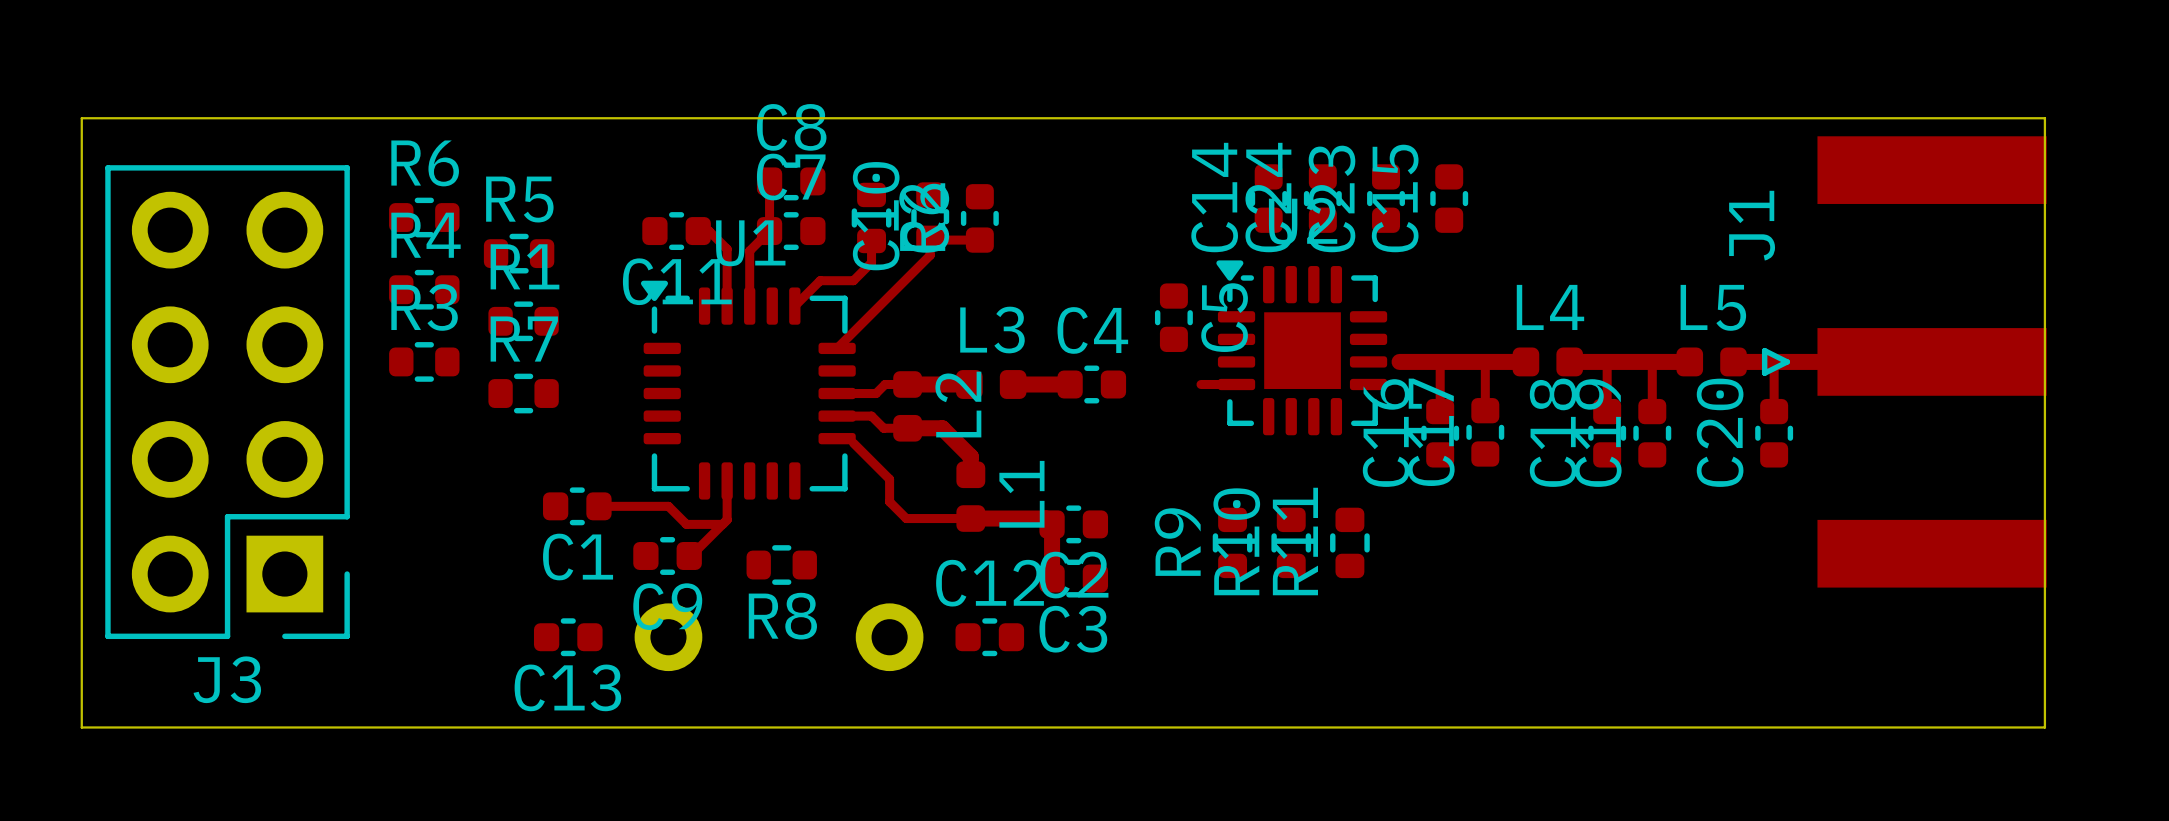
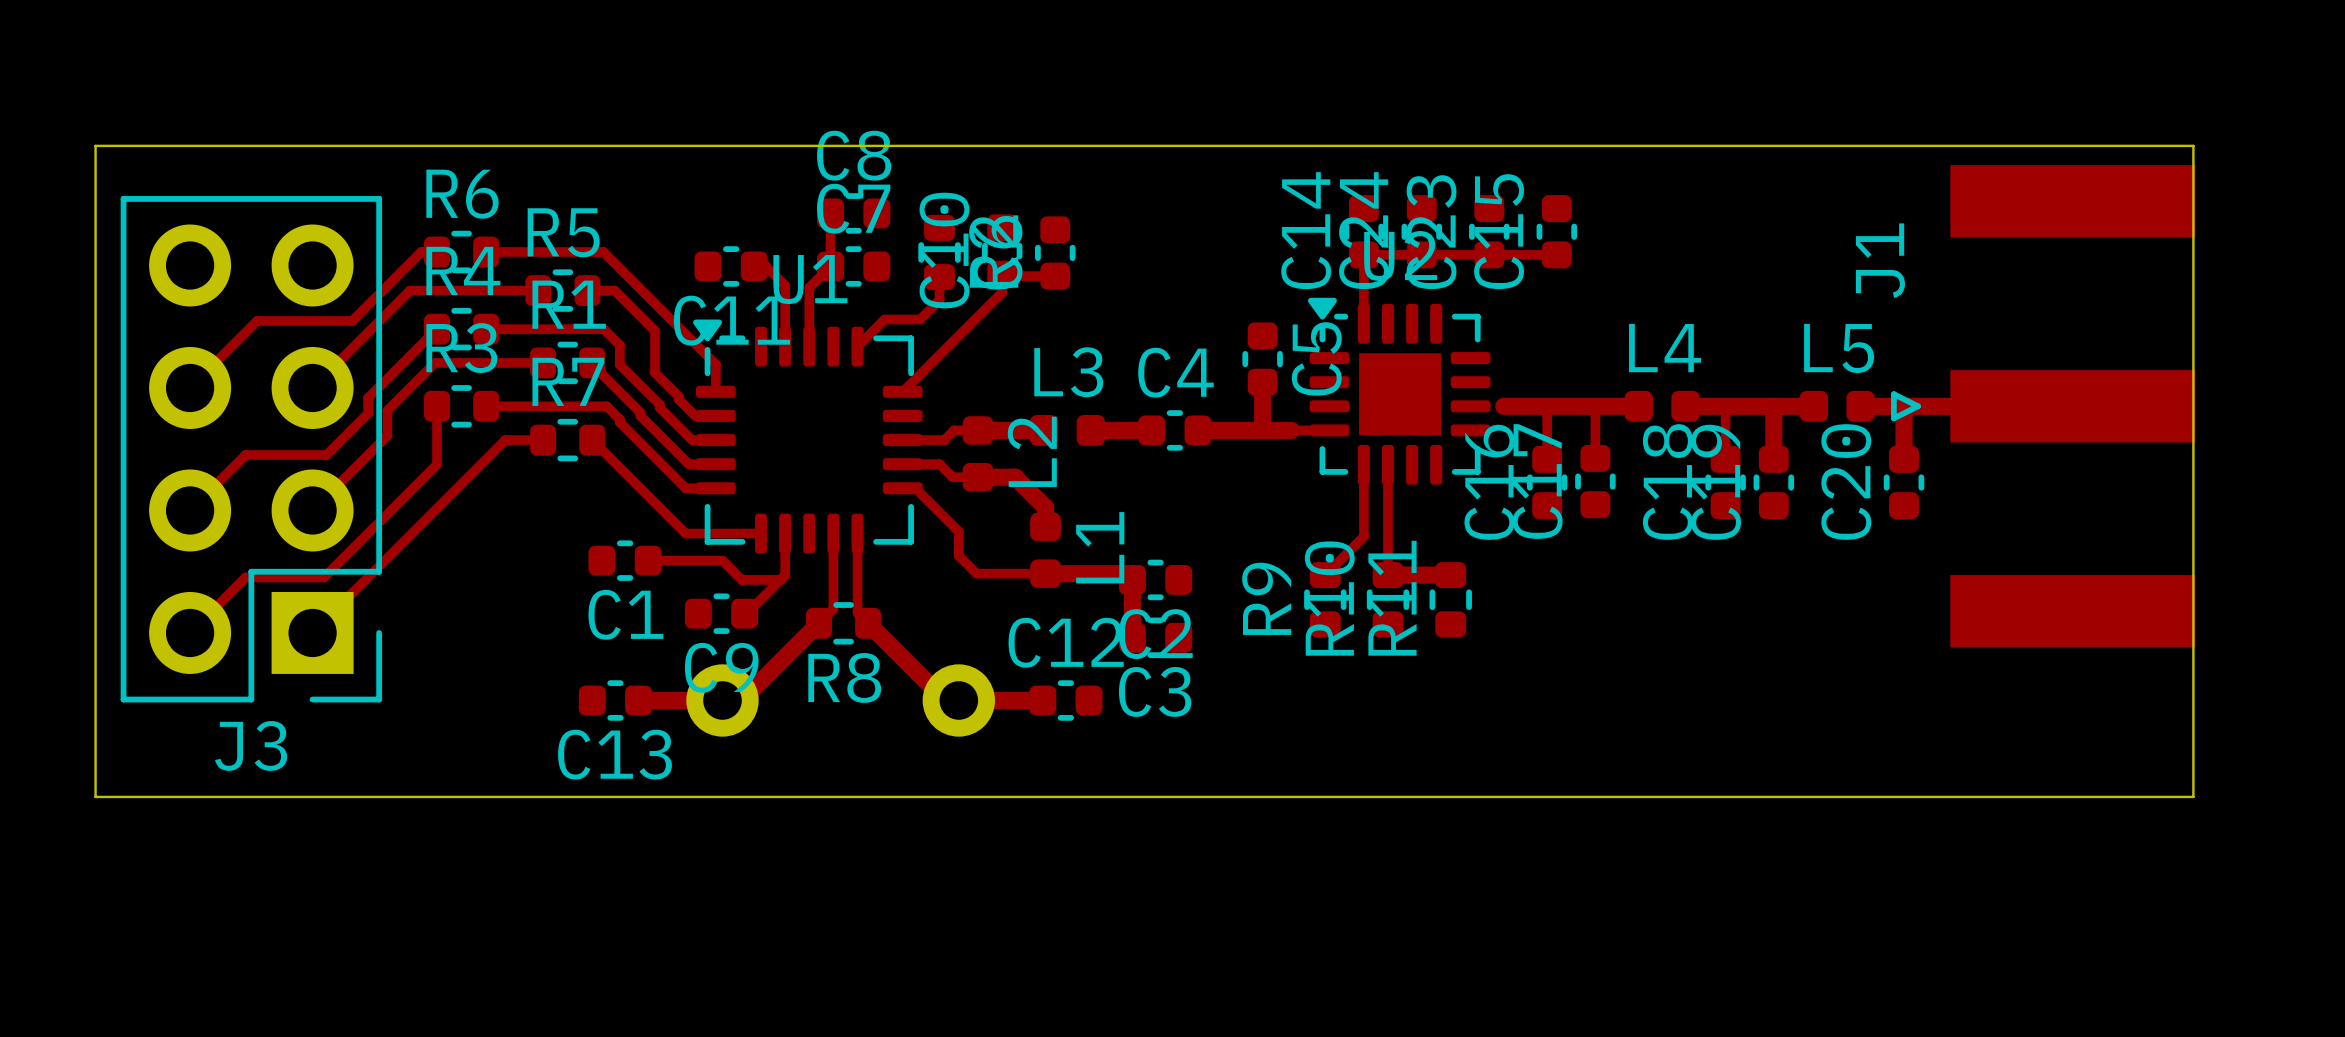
track: none -> (437, 251) (421, 251) (352, 321) (257, 321) (190, 387)
track: none -> (486, 251) (603, 251) (715, 364) (715, 391)
track: none -> (1556, 254) (1363, 254) (1363, 323)
track: none -> (538, 290) (410, 290) (312, 387)
track: none -> (587, 290) (614, 290) (654, 330) (654, 372) (695, 415) (715, 415)
track: none -> (437, 329) (368, 398) (368, 413) (326, 454) (245, 454) (190, 510)
track: none -> (486, 329) (603, 329) (619, 345) (619, 364) (692, 440) (715, 440)
track: none -> (543, 362) (435, 362) (387, 410) (387, 435) (312, 510)
track: none -> (592, 362) (640, 412) (640, 415) (688, 464) (715, 464)
track: none -> (1262, 382) (1262, 430)
track: none -> (437, 406) (437, 464) (324, 577) (245, 577) (190, 632)
track: none -> (486, 406) (606, 406) (619, 419) (619, 422) (685, 488) (715, 488)
track width: thin (1652, 361) (1652, 411) -> thick (1773, 406) (1773, 459)
track width: thin (1774, 361) (1774, 411) -> thick (1904, 406) (1904, 459)
track: none -> (1198, 430) (1291, 430)
track: none -> (543, 440) (505, 440) (312, 632)
track: none -> (592, 440) (685, 533) (761, 533)
track: none -> (1363, 464) (1363, 536) (1325, 575)
track: none -> (1388, 464) (1388, 575) (1450, 575)
track: none -> (833, 533) (833, 608) (741, 700) (638, 700)
track: none -> (857, 533) (857, 612) (945, 700) (1042, 700)

